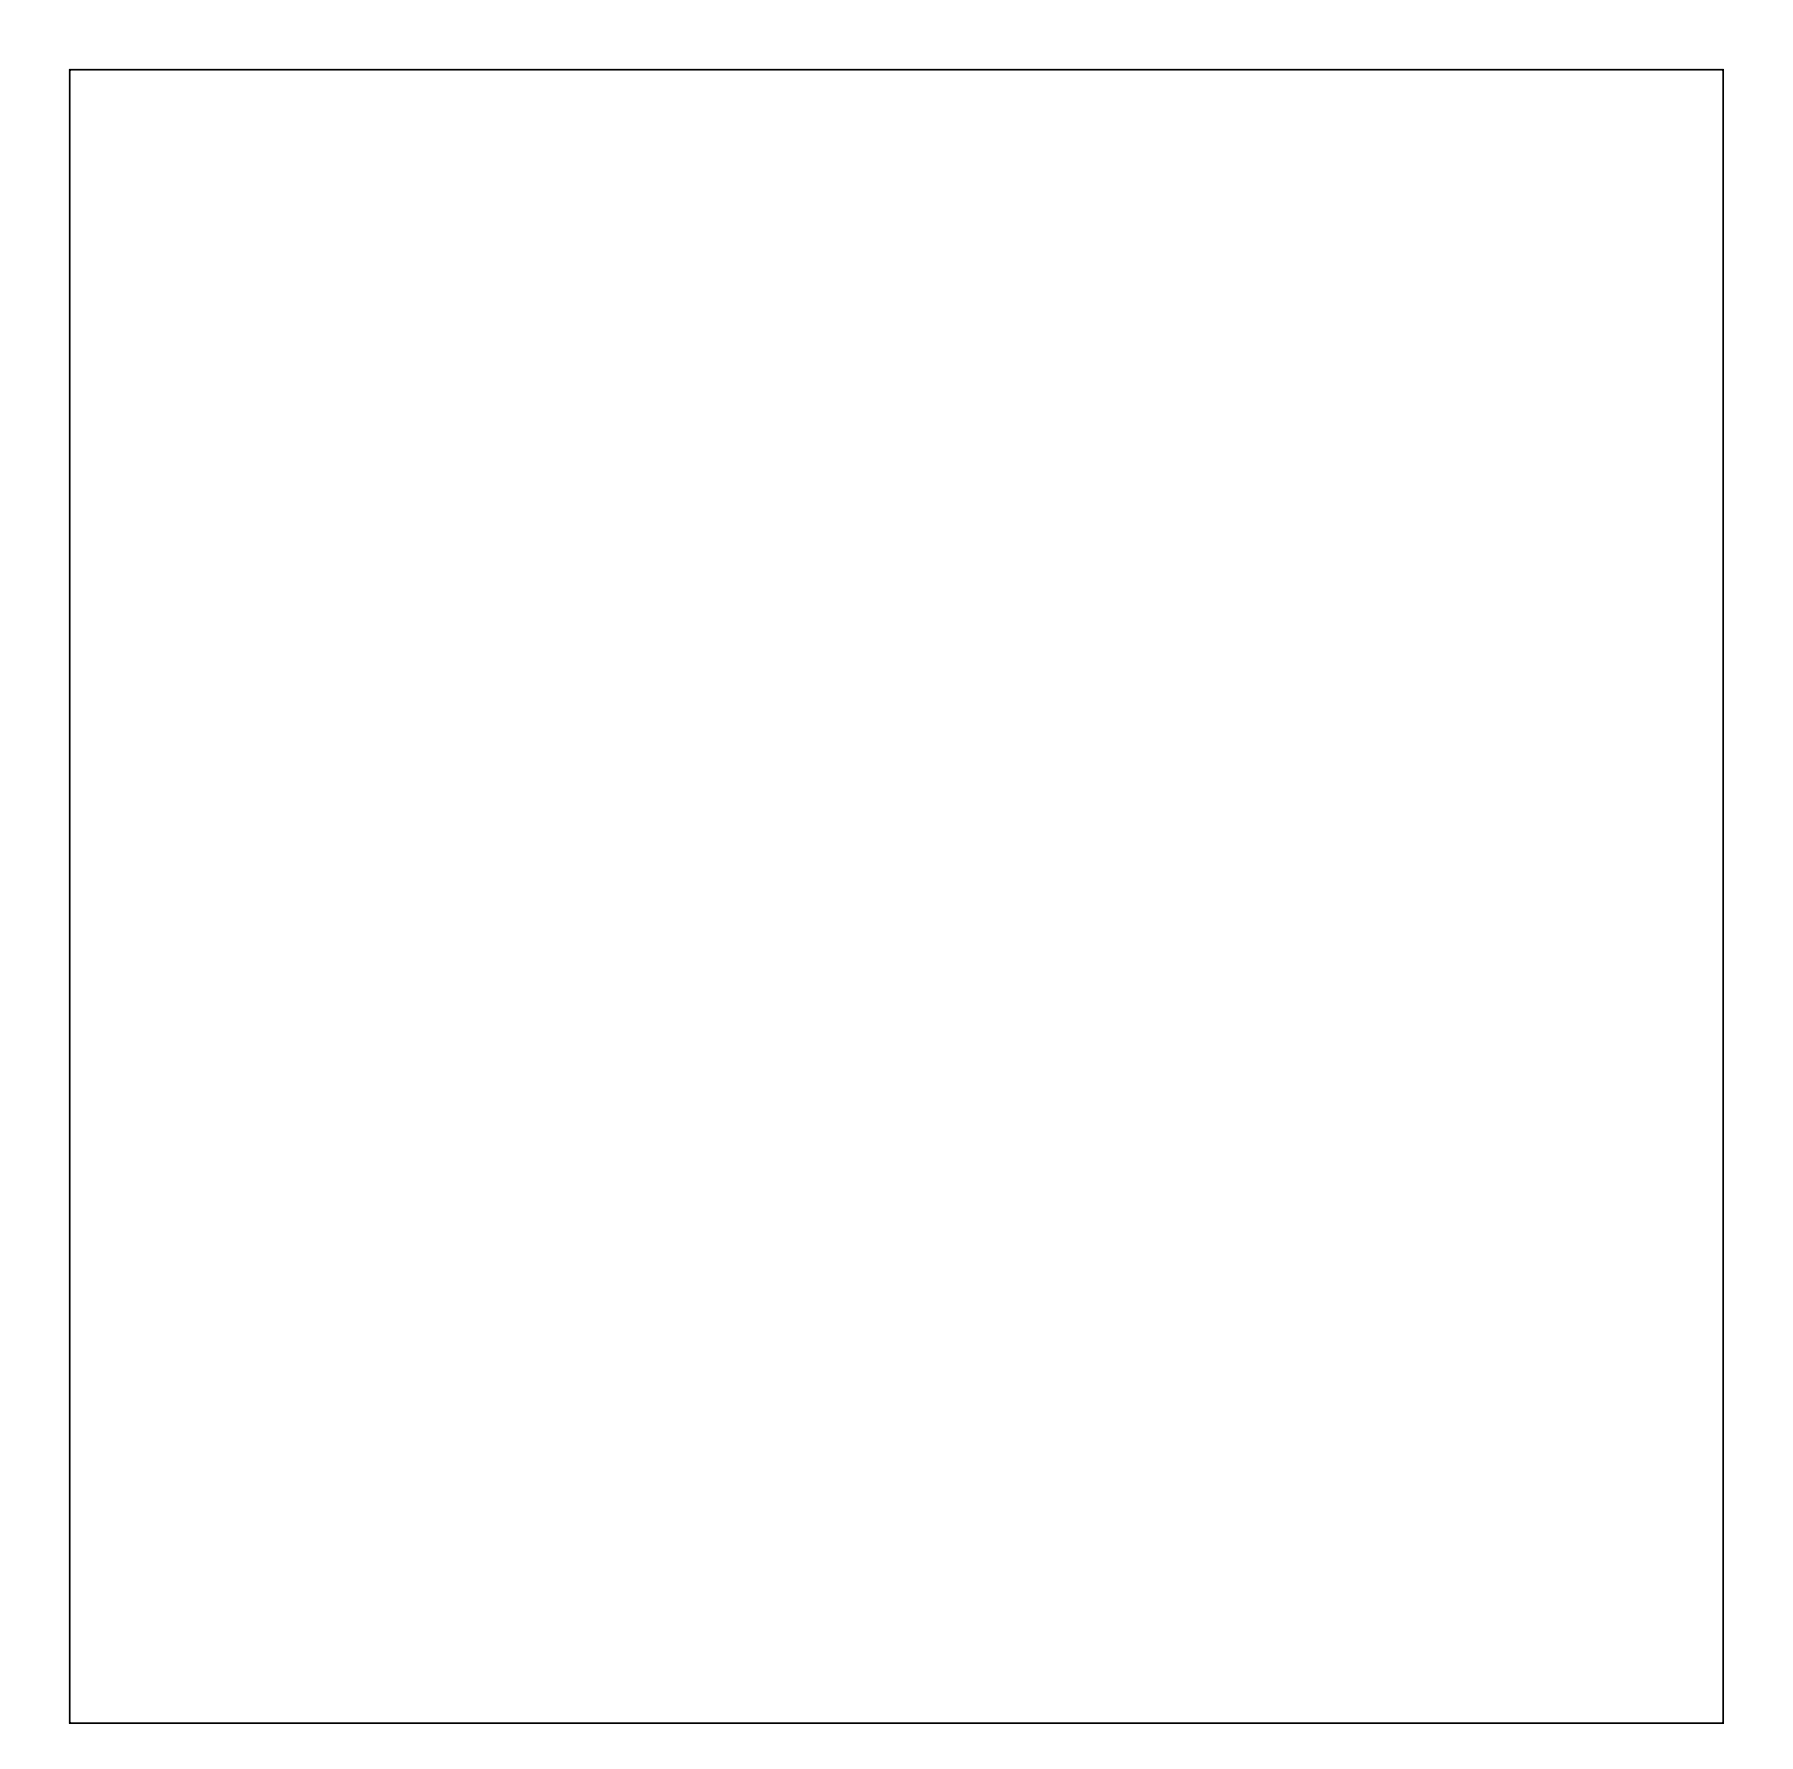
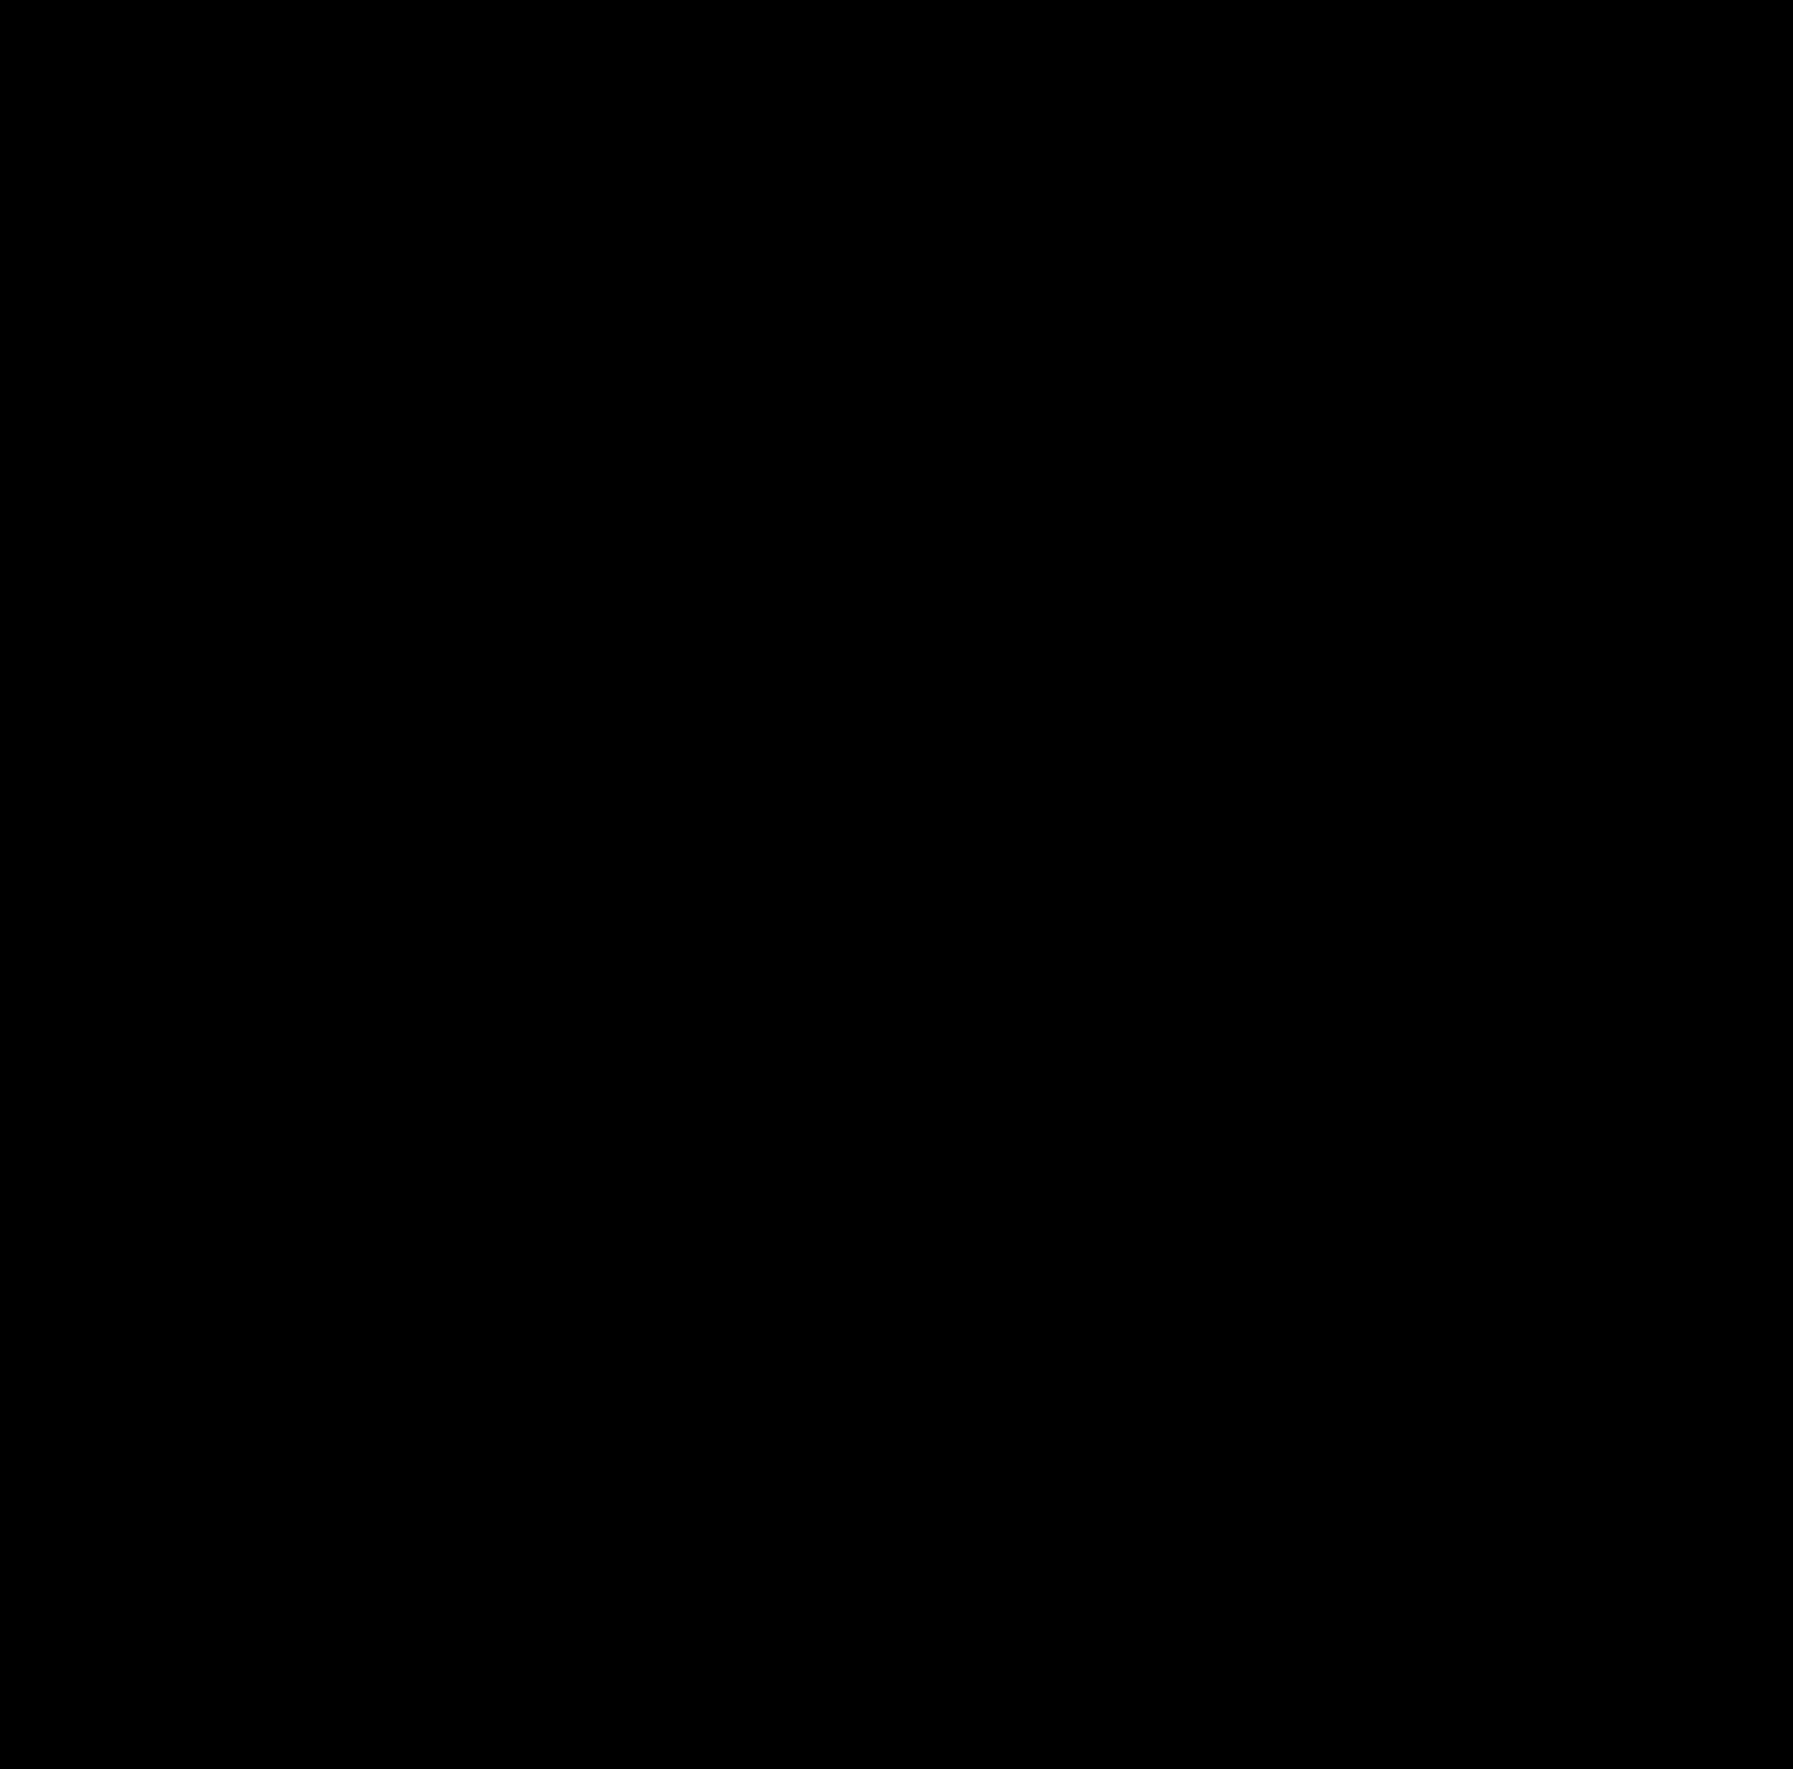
board edge: (69, 69) (1723, 69) (1723, 1723) (69, 1723) (69, 69) -> none

